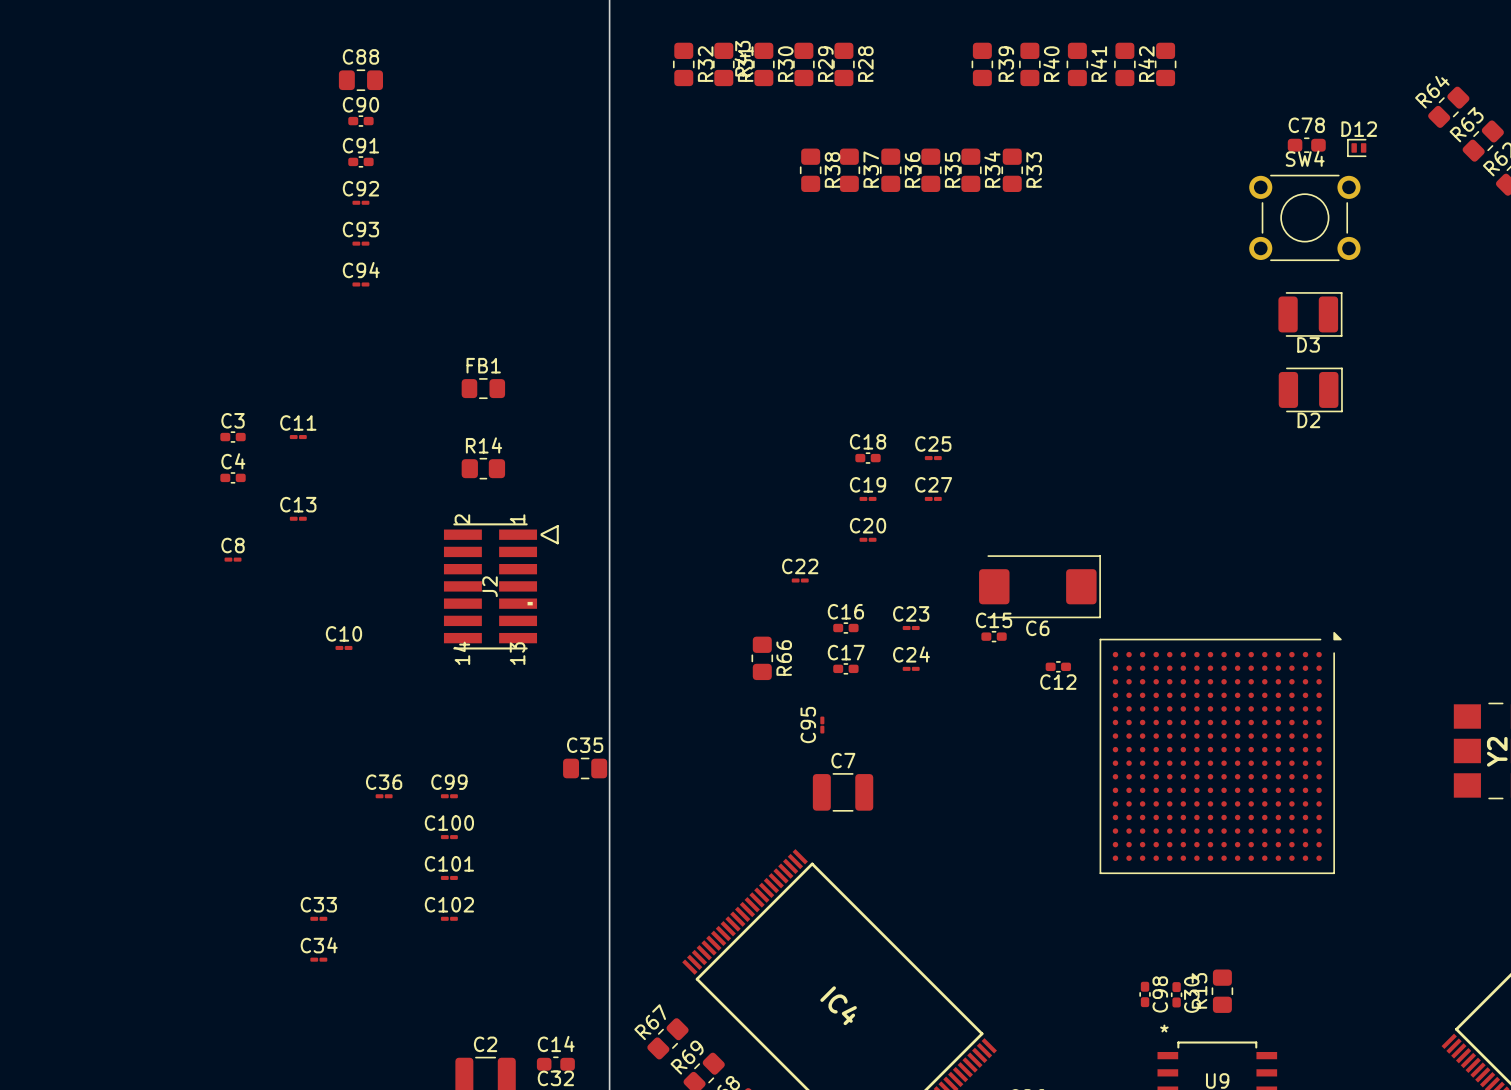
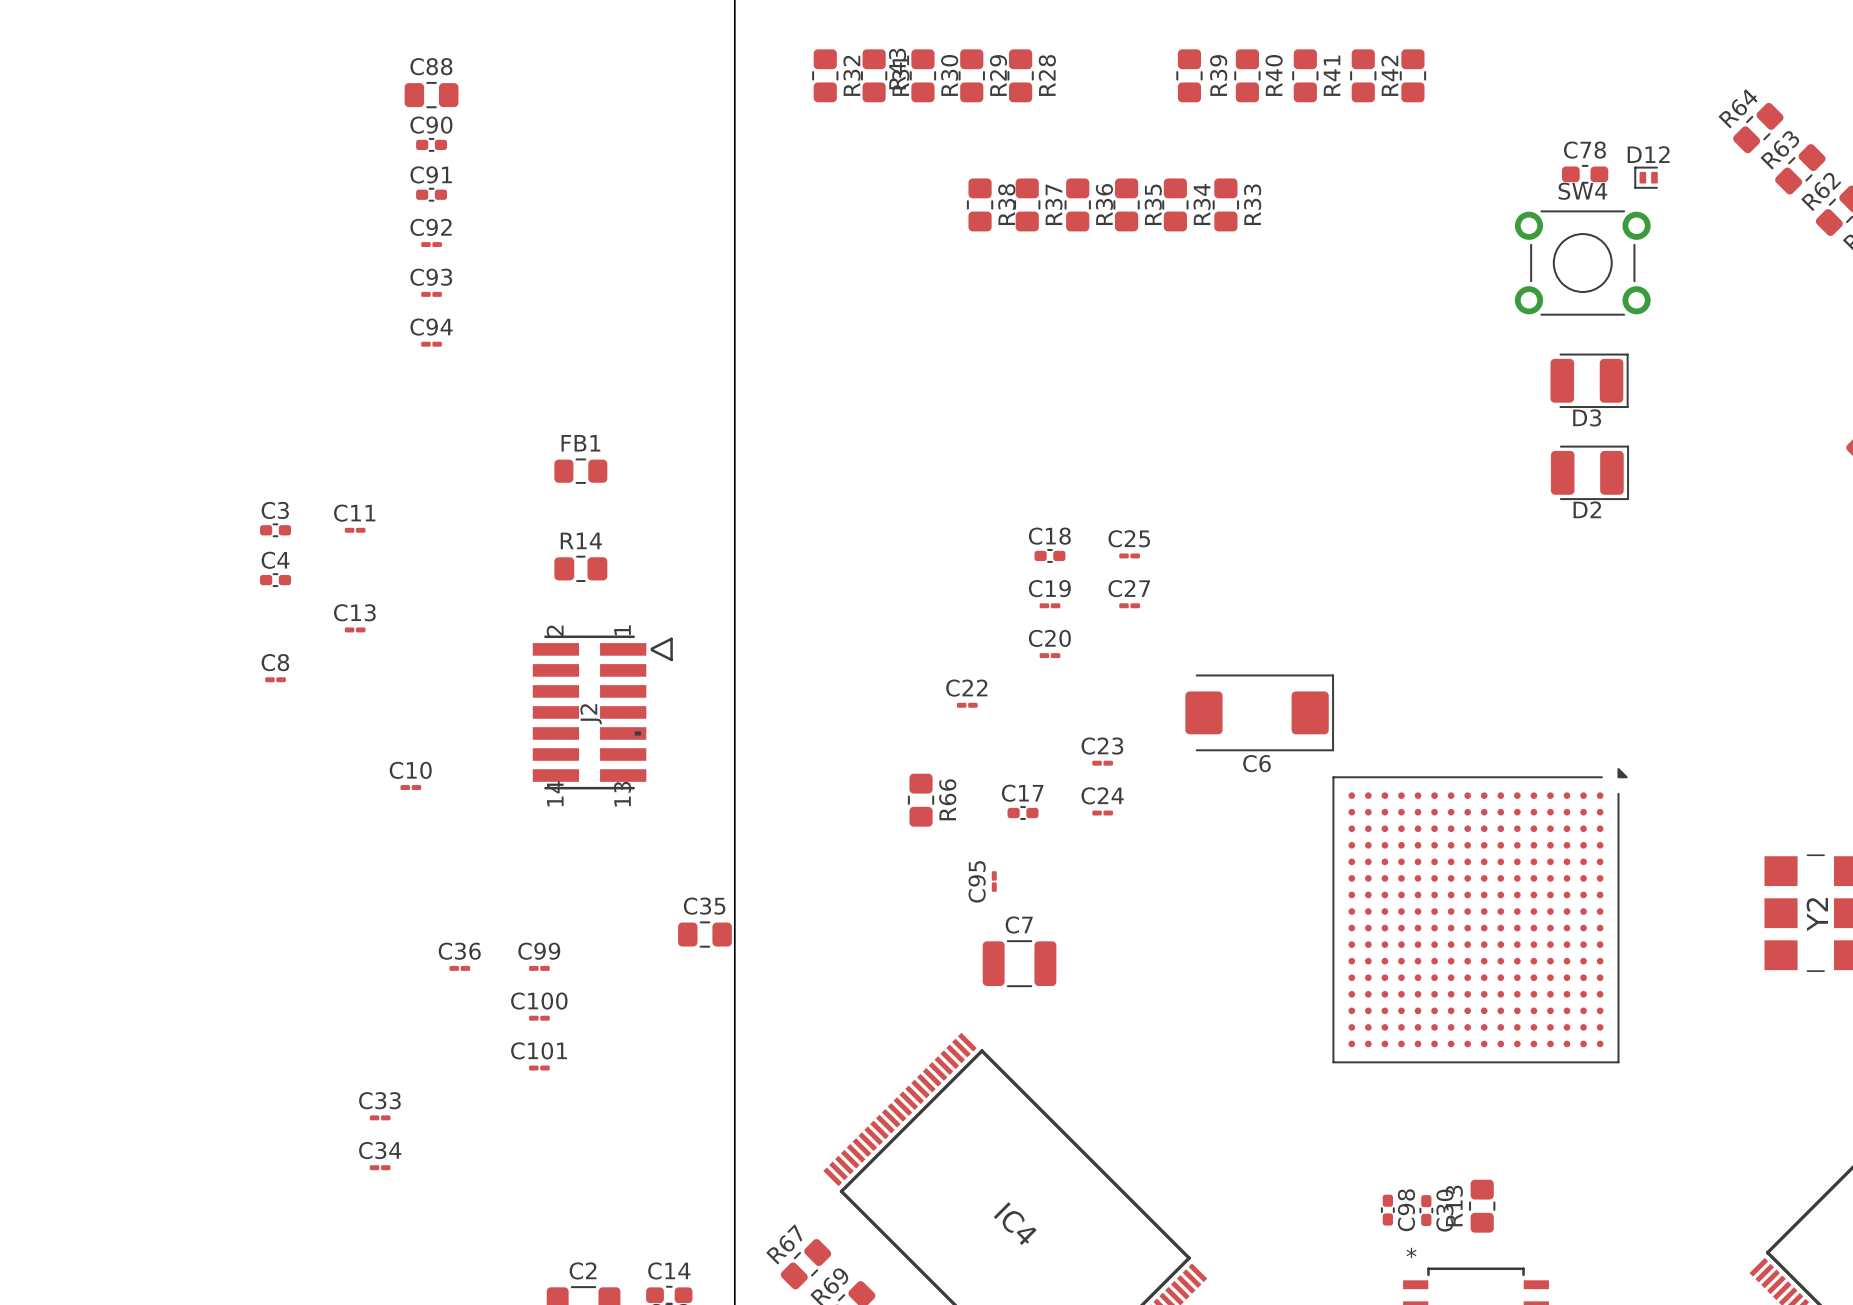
C16: (845, 628) -> none
C15: (994, 636) -> none
C12: (1058, 666) -> none
C102: (449, 918) -> none

